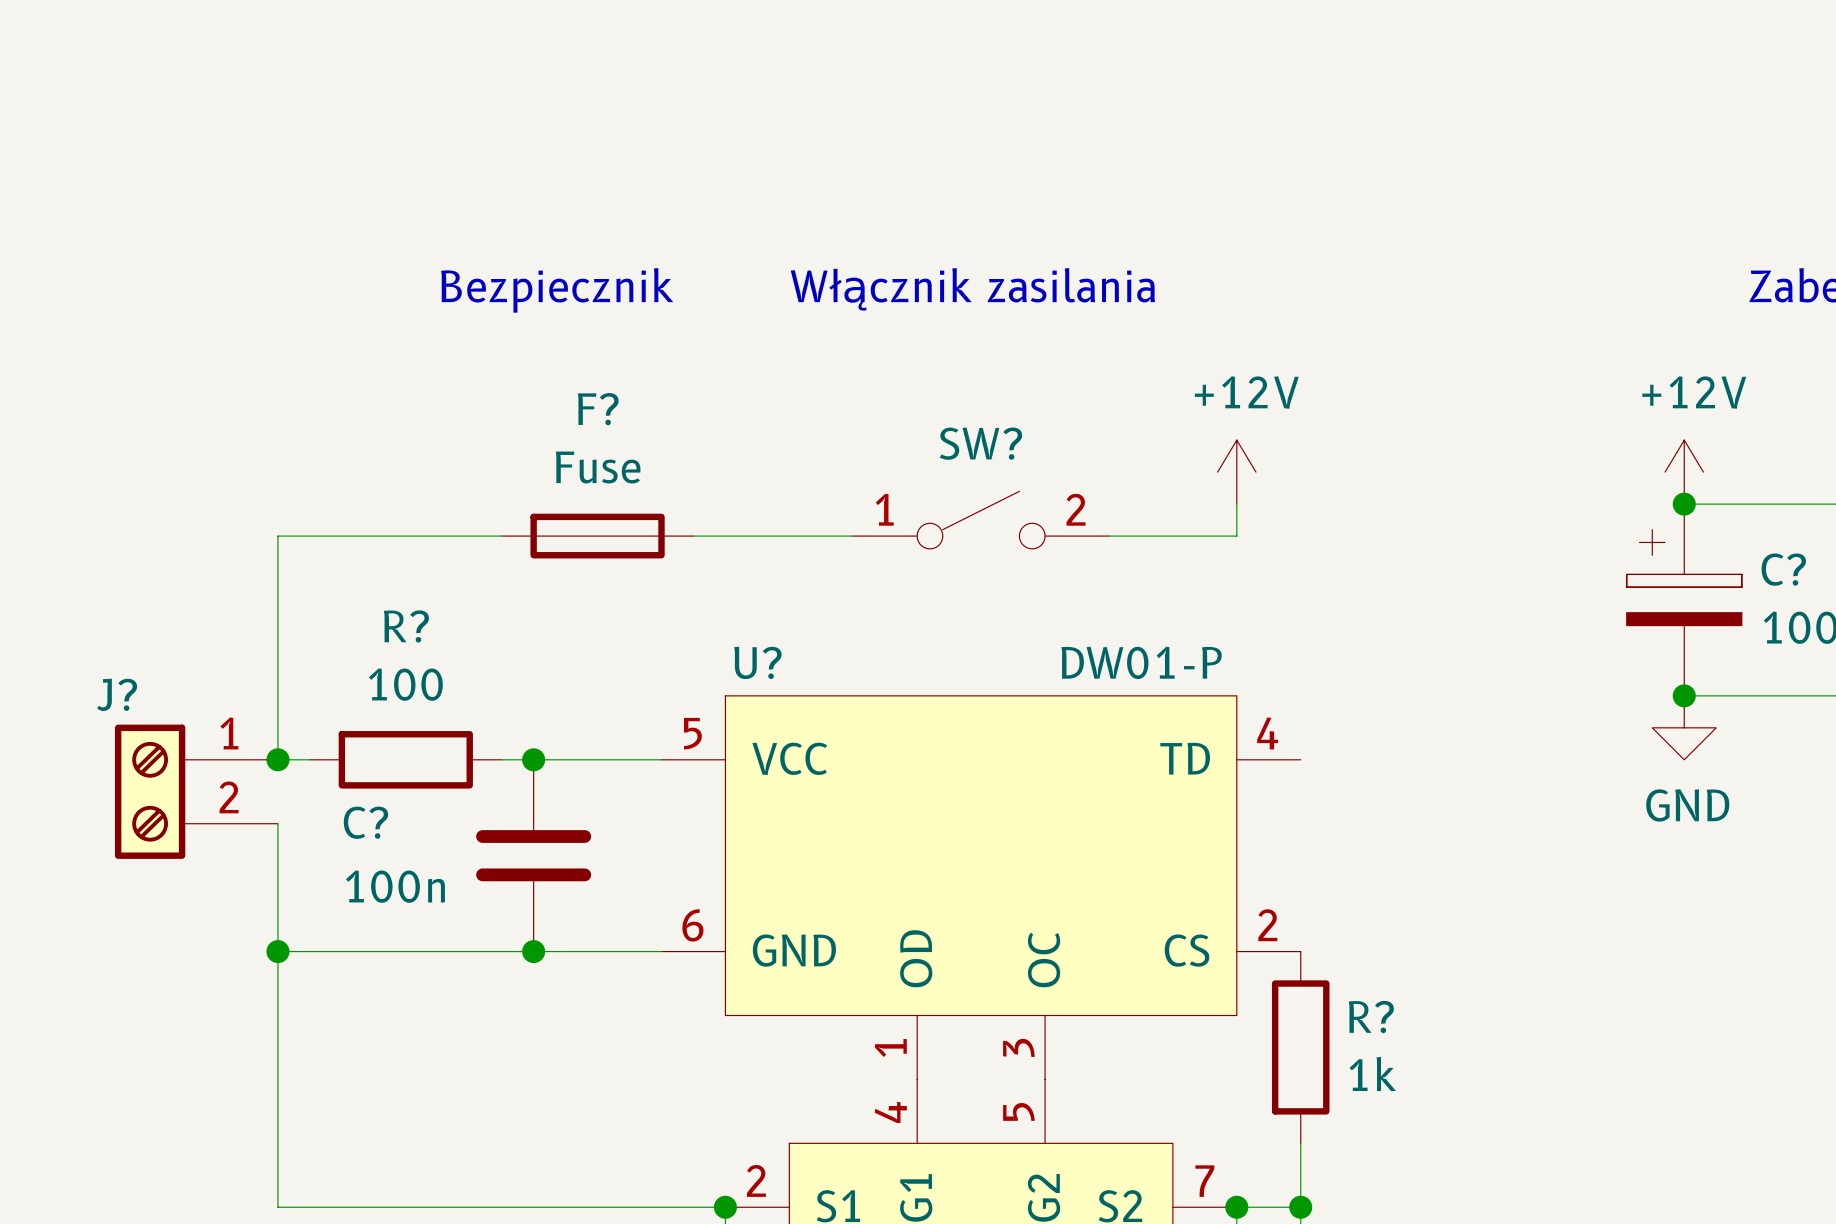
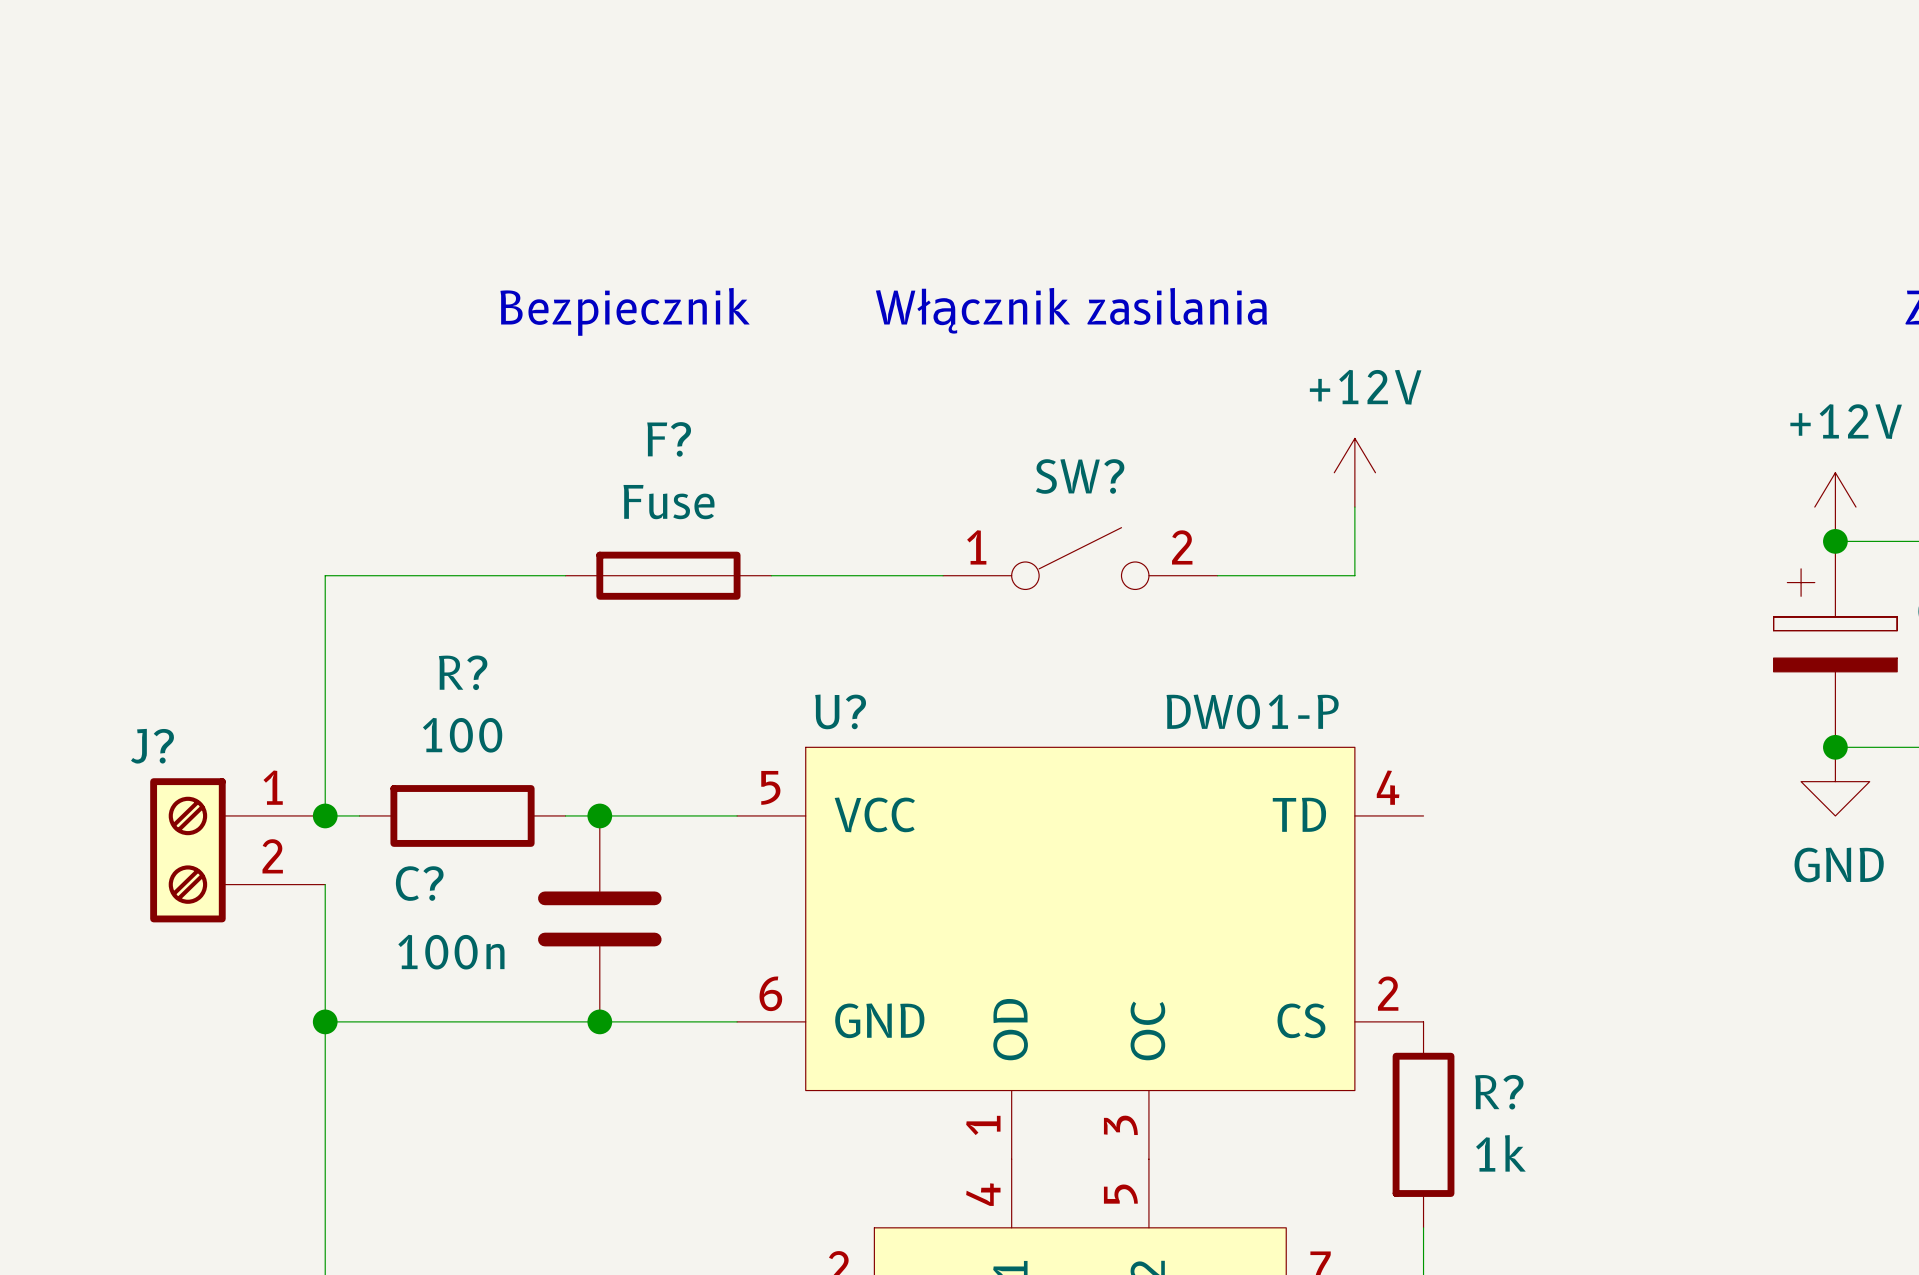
power symbol position: +12V (1236, 472) -> +12V (1354, 472)

